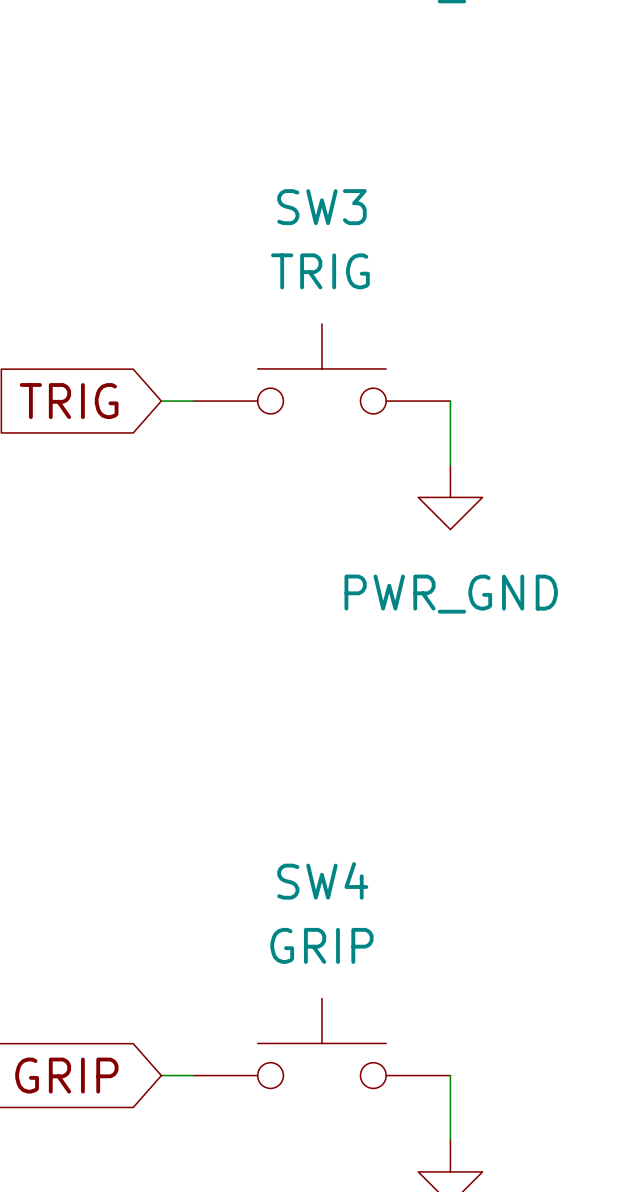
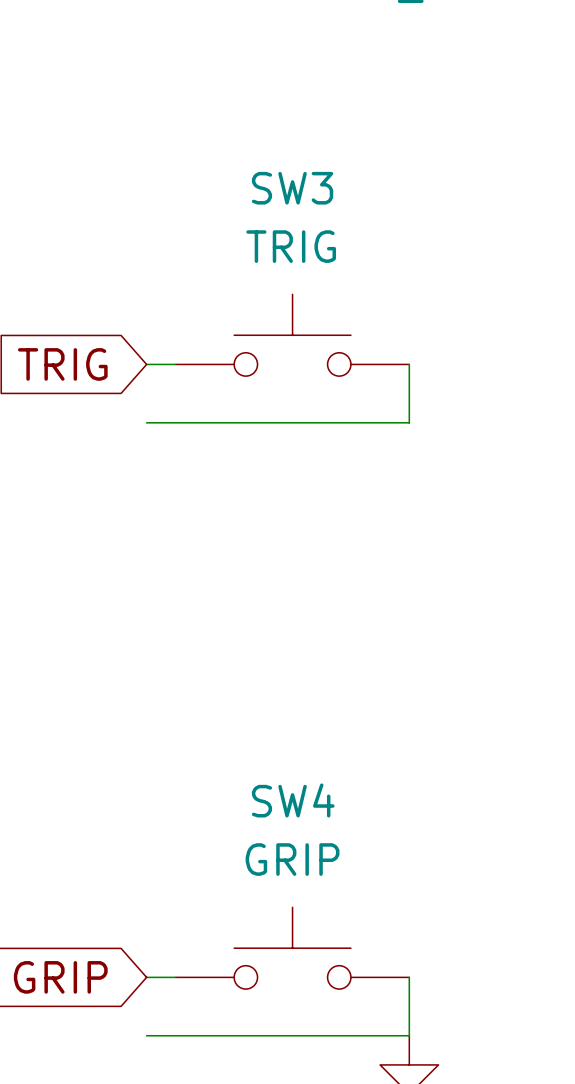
wire: none -> (146, 422) (409, 422)
power symbol: PWR_GND (450, 497) -> none
wire: none -> (146, 1035) (409, 1035)

